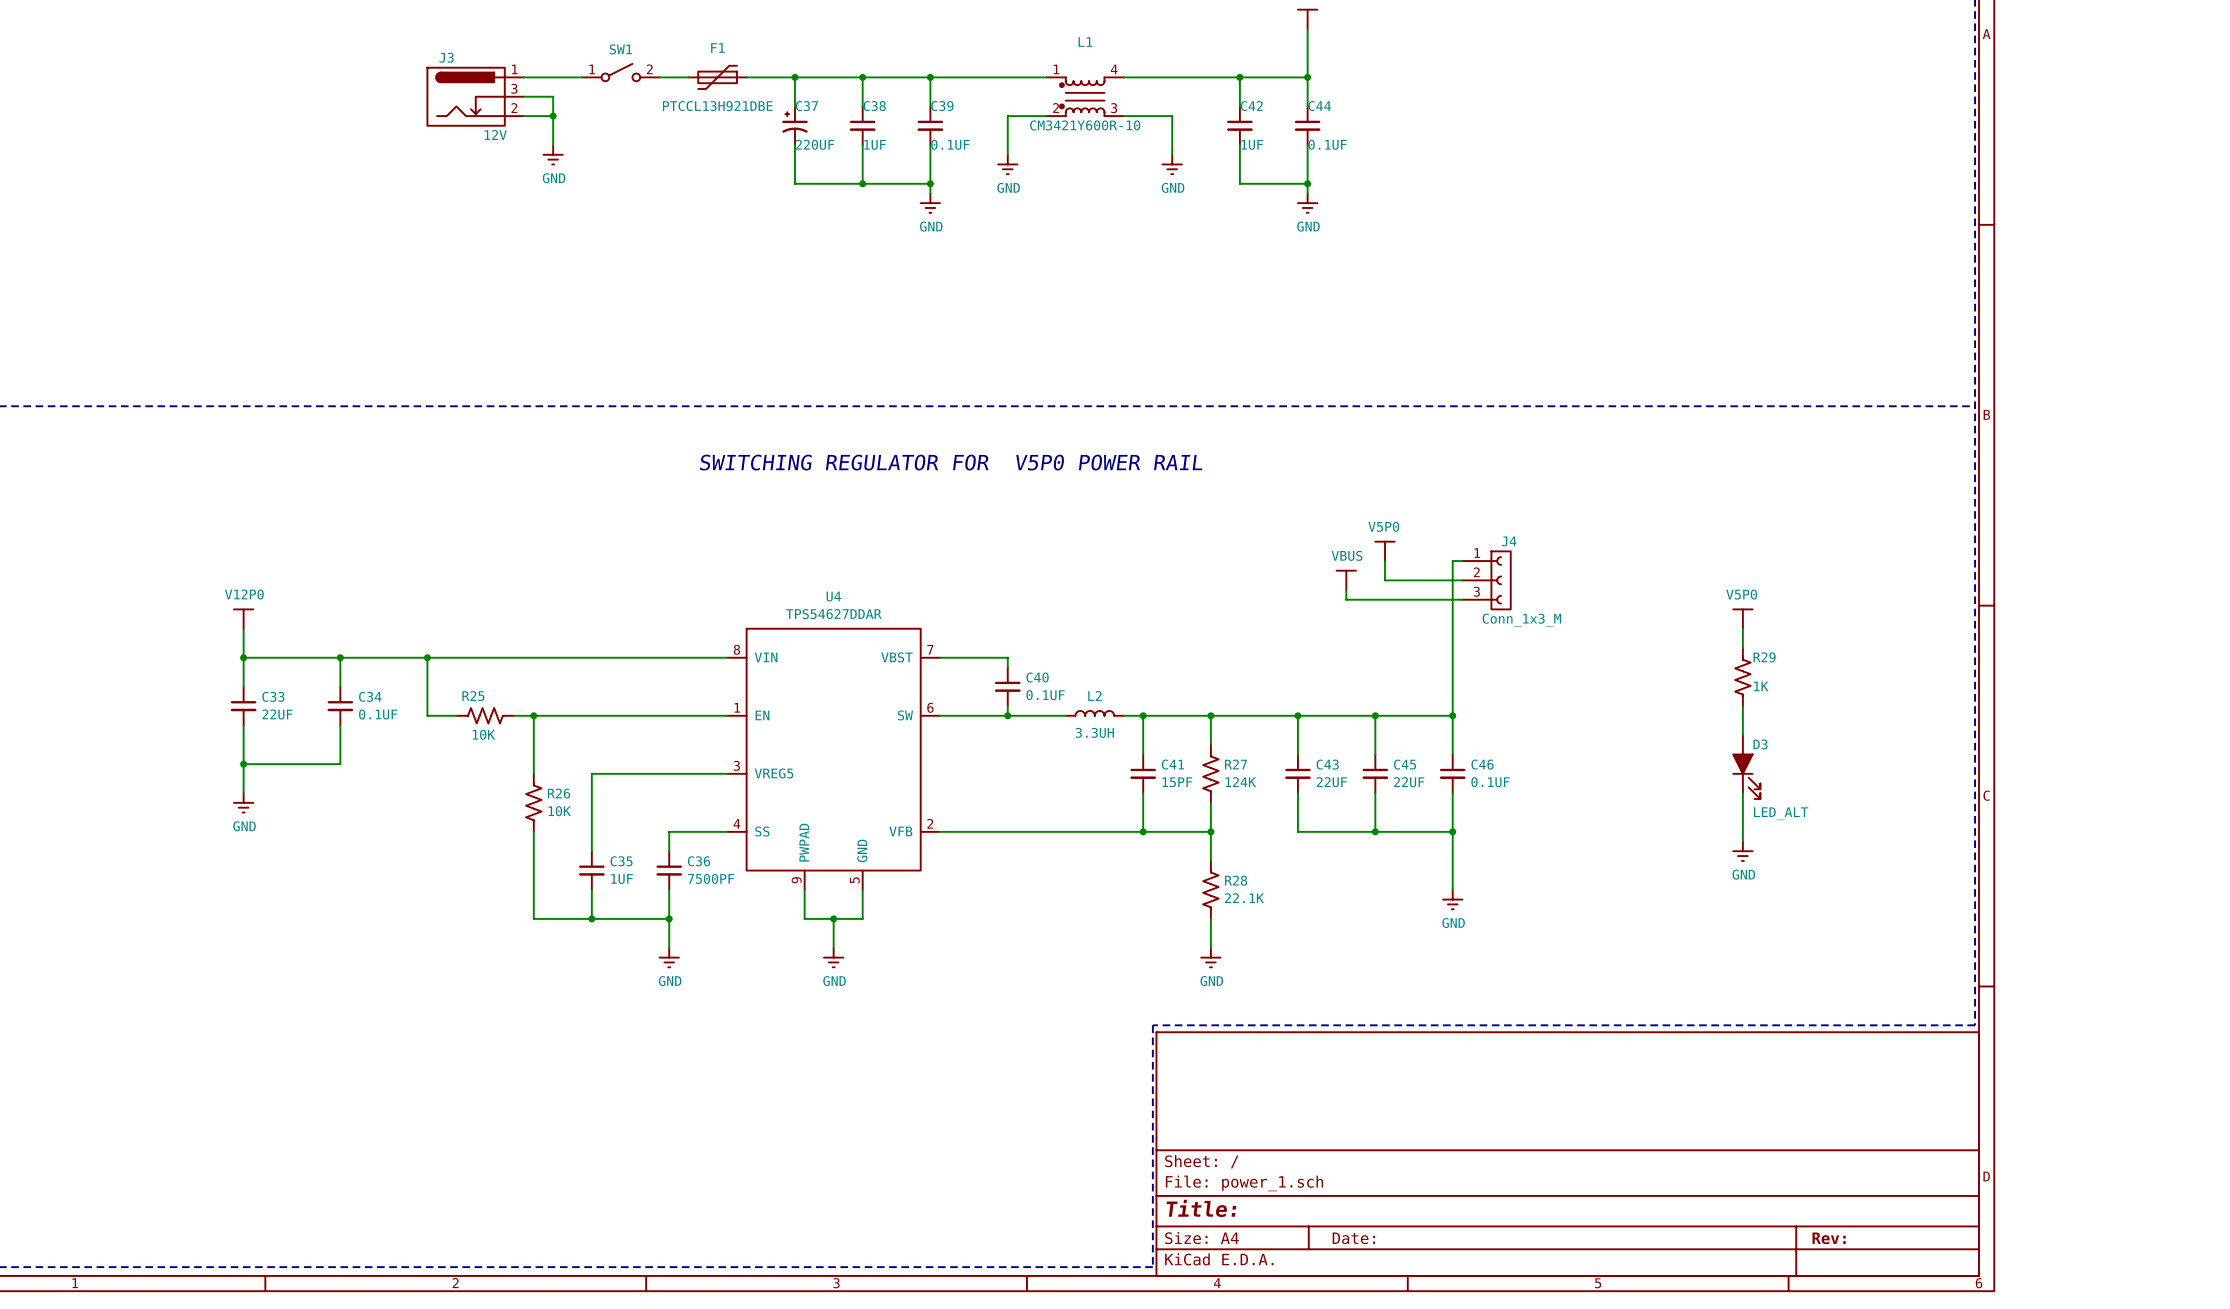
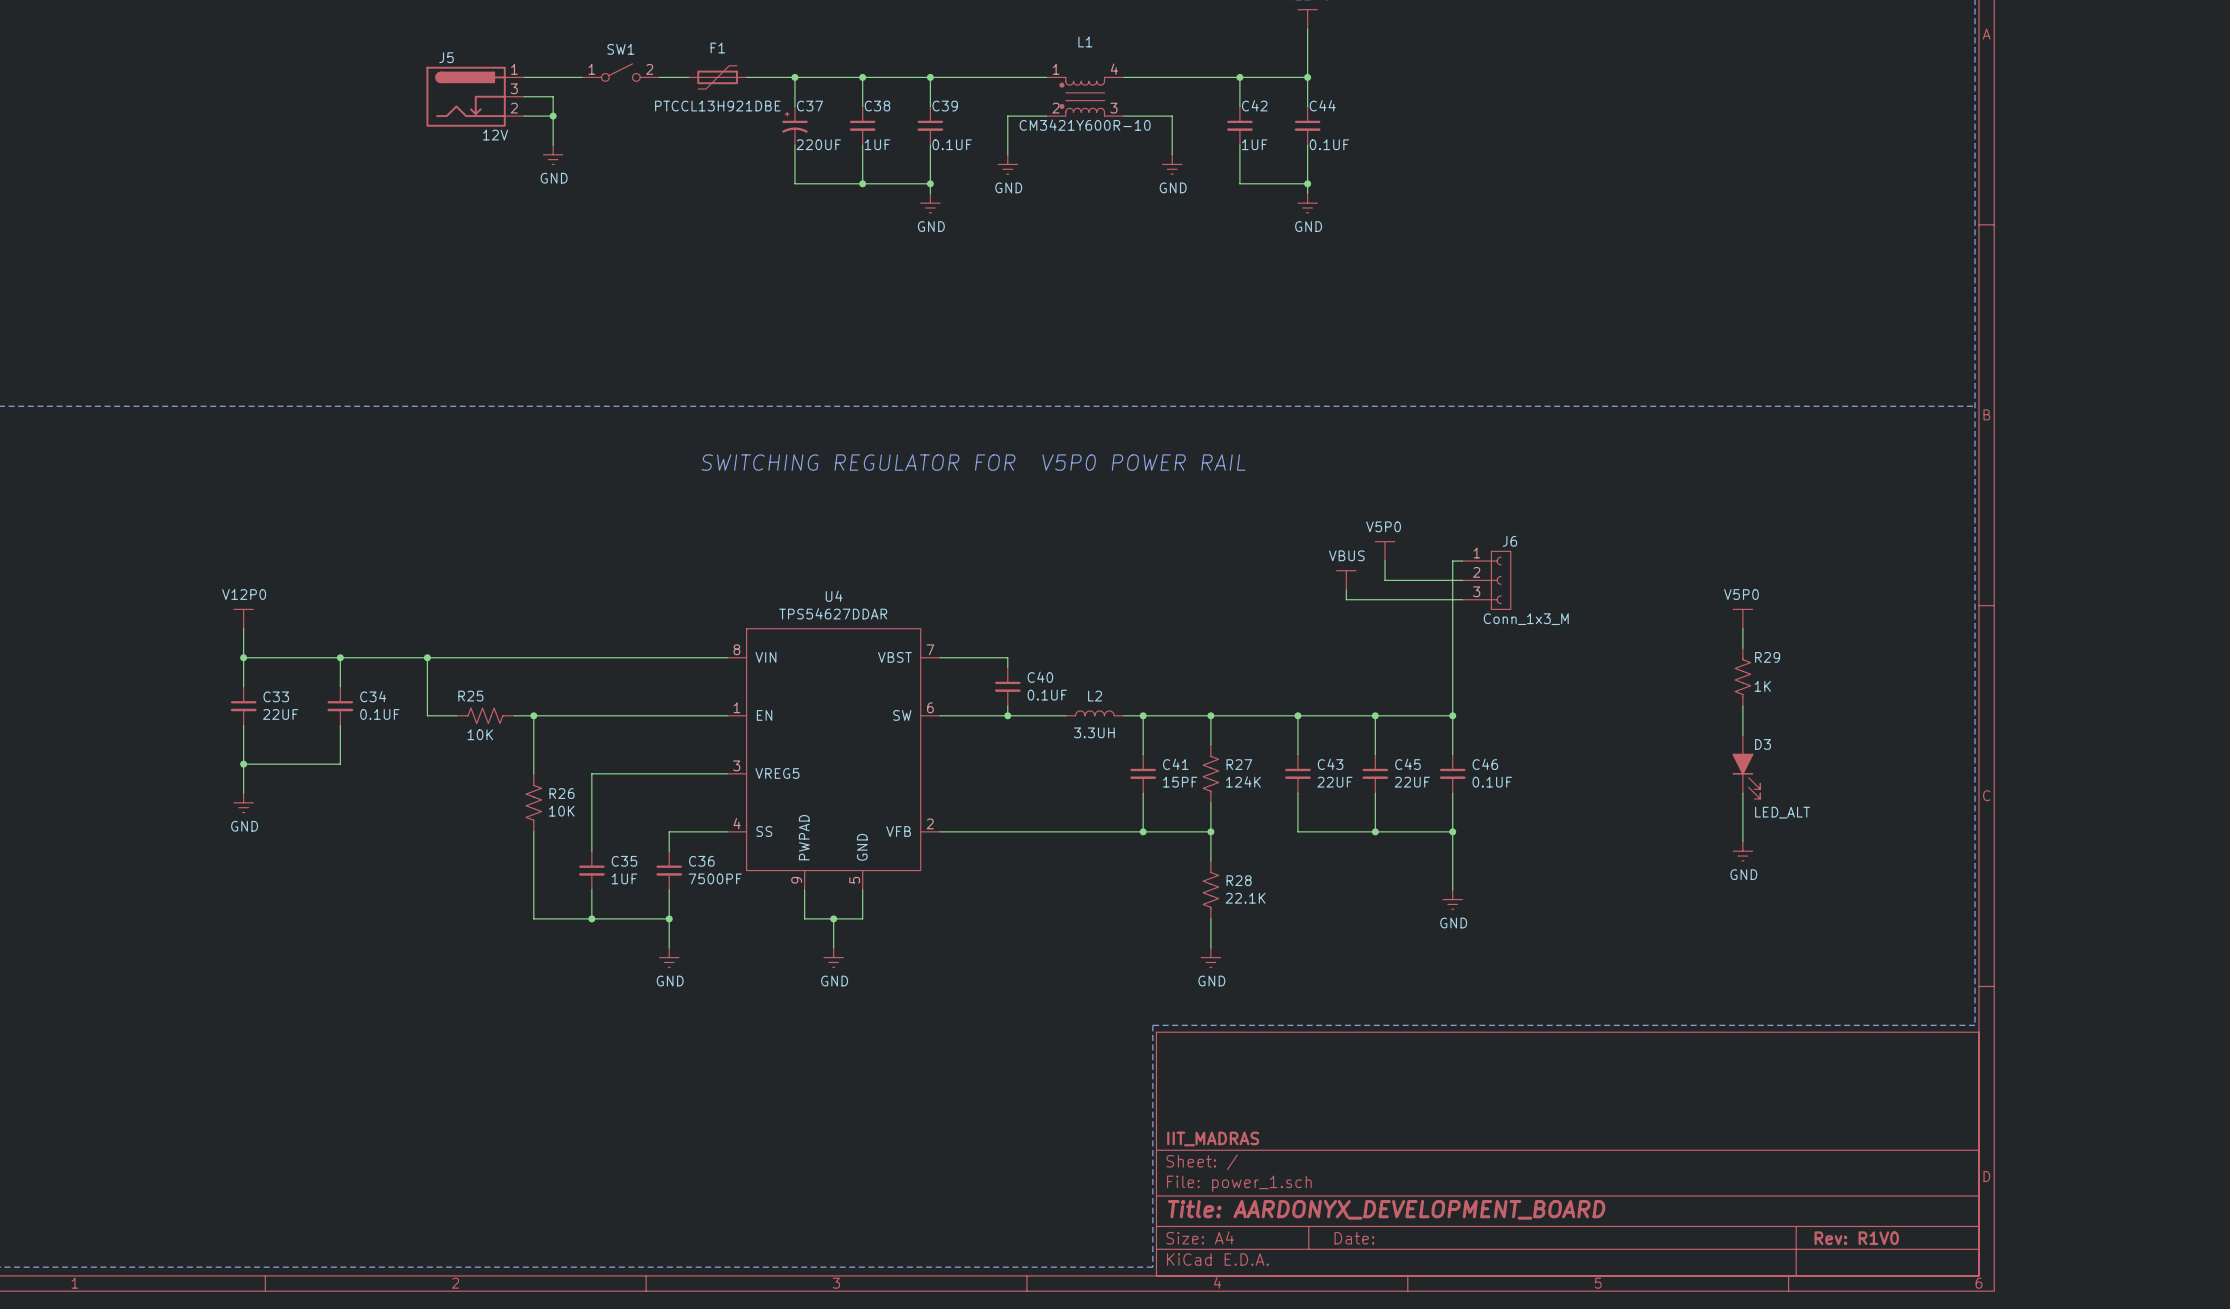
J3 name: J3 (446, 57) -> J5 (446, 57)
J4 name: J4 (1509, 541) -> J6 (1509, 541)
title block: none -> IIT_MADRAS (1213, 1138)
title block: Title: (1201, 1208) -> Title: AARDONYX_DEVELOPMENT_BOARD (1386, 1209)
title block: Rev: (1829, 1238) -> Rev: R1V0 (1856, 1238)

